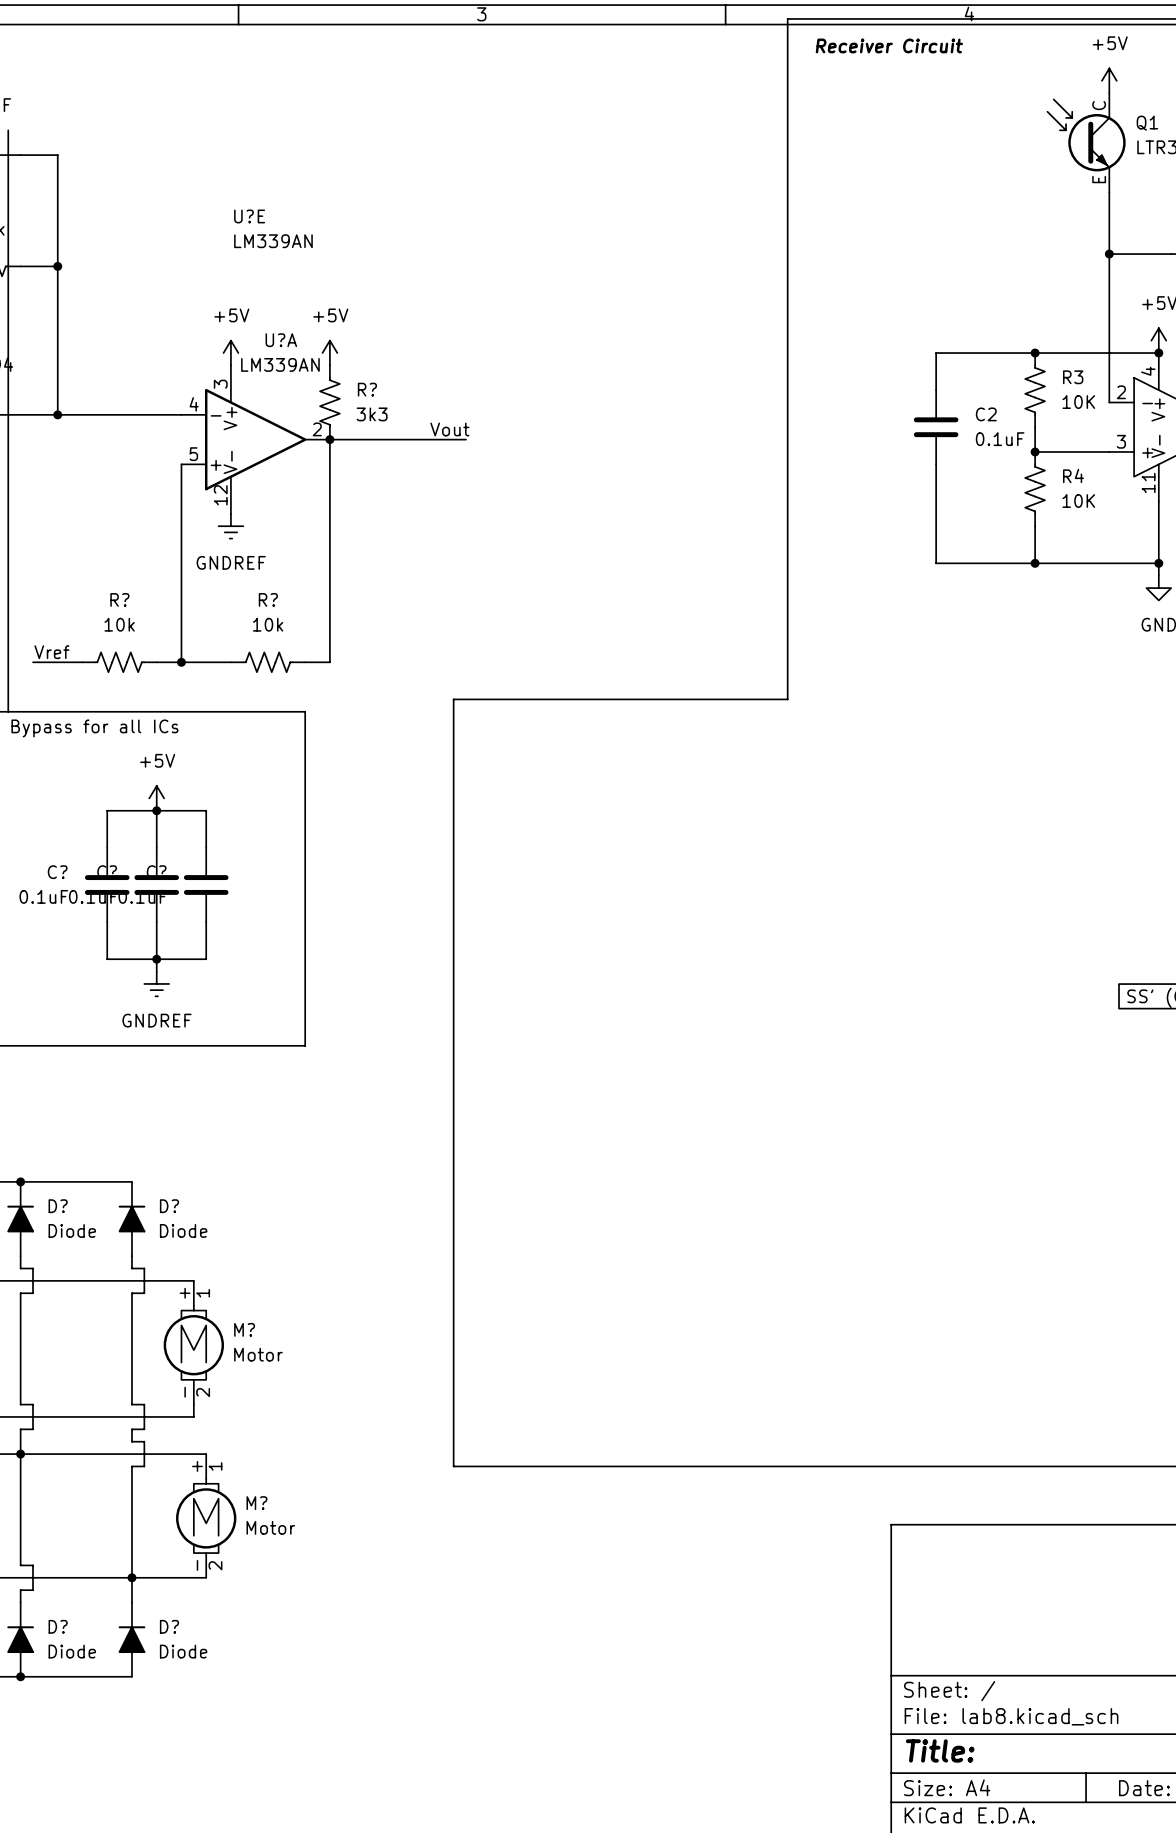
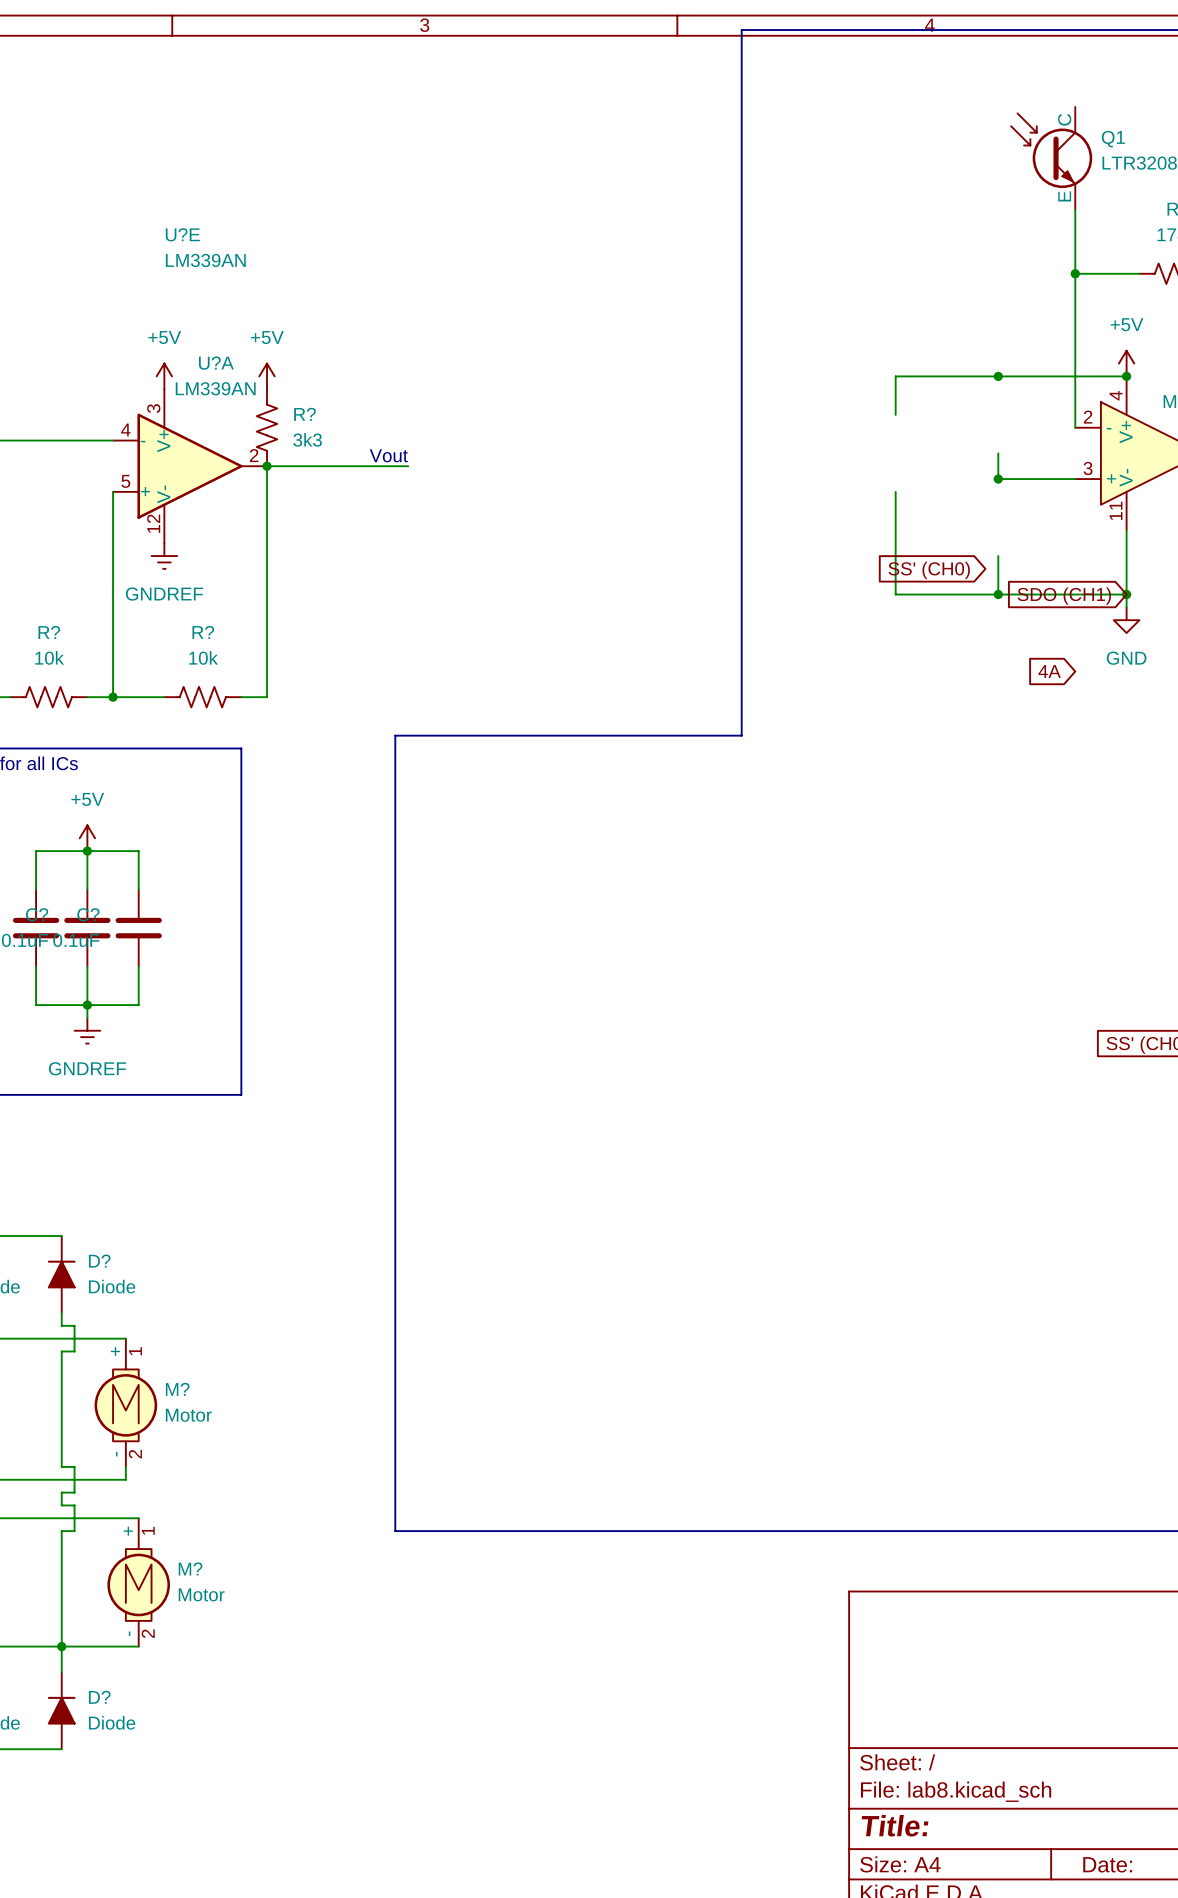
text: Receiver Circuit (889, 45) -> none
power symbol: +5V (1109, 80) -> none
R3: 10K (1035, 390) -> none
C2: 0.1uF (936, 427) -> none
R4: 10K (1035, 489) -> none
global label: none -> SS' (CH0) (929, 570)
global label: none -> SDO (CH1) (1064, 596)
global label: none -> 4A (1049, 671)

